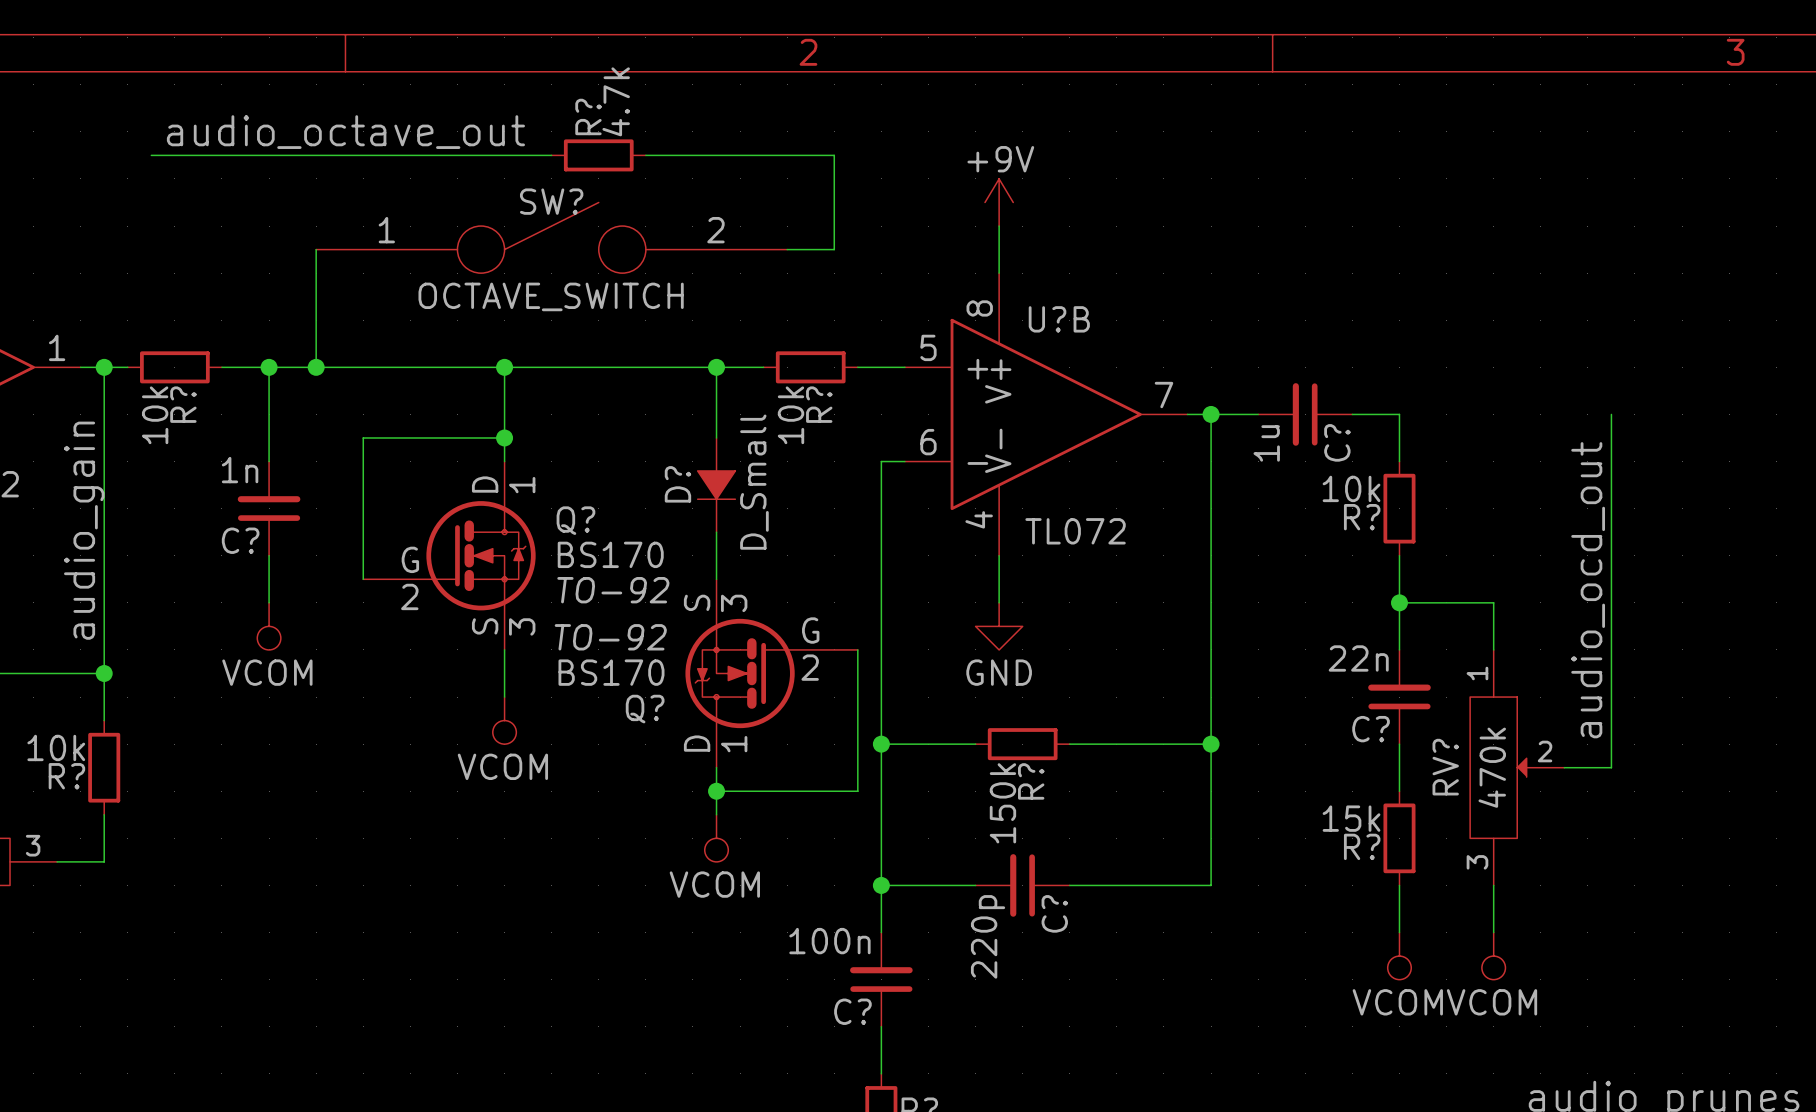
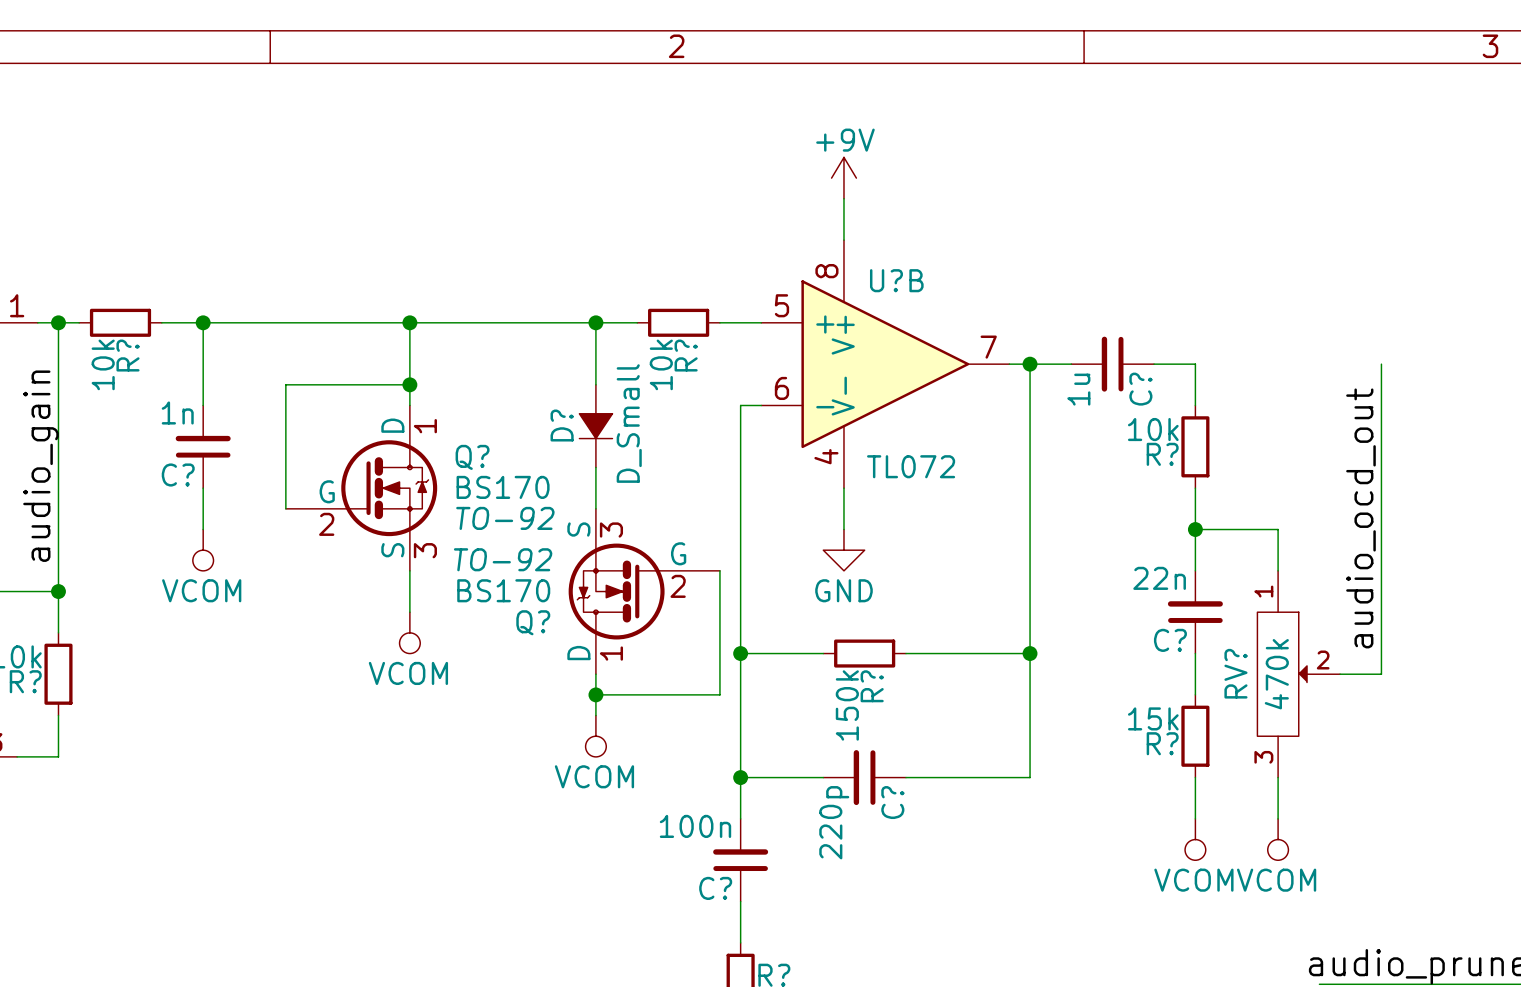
label: audio_octave_out (345, 132) -> none
wire: (151, 155) (551, 155) -> none
R?: 4.7k (598, 155) -> none
wire: (645, 155) (834, 155) (834, 249) (787, 249) -> none
SW?: OCTAVE_SWITCH (551, 237) -> none
wire: (316, 249) (316, 367) -> none
junction: (316, 367) -> none

